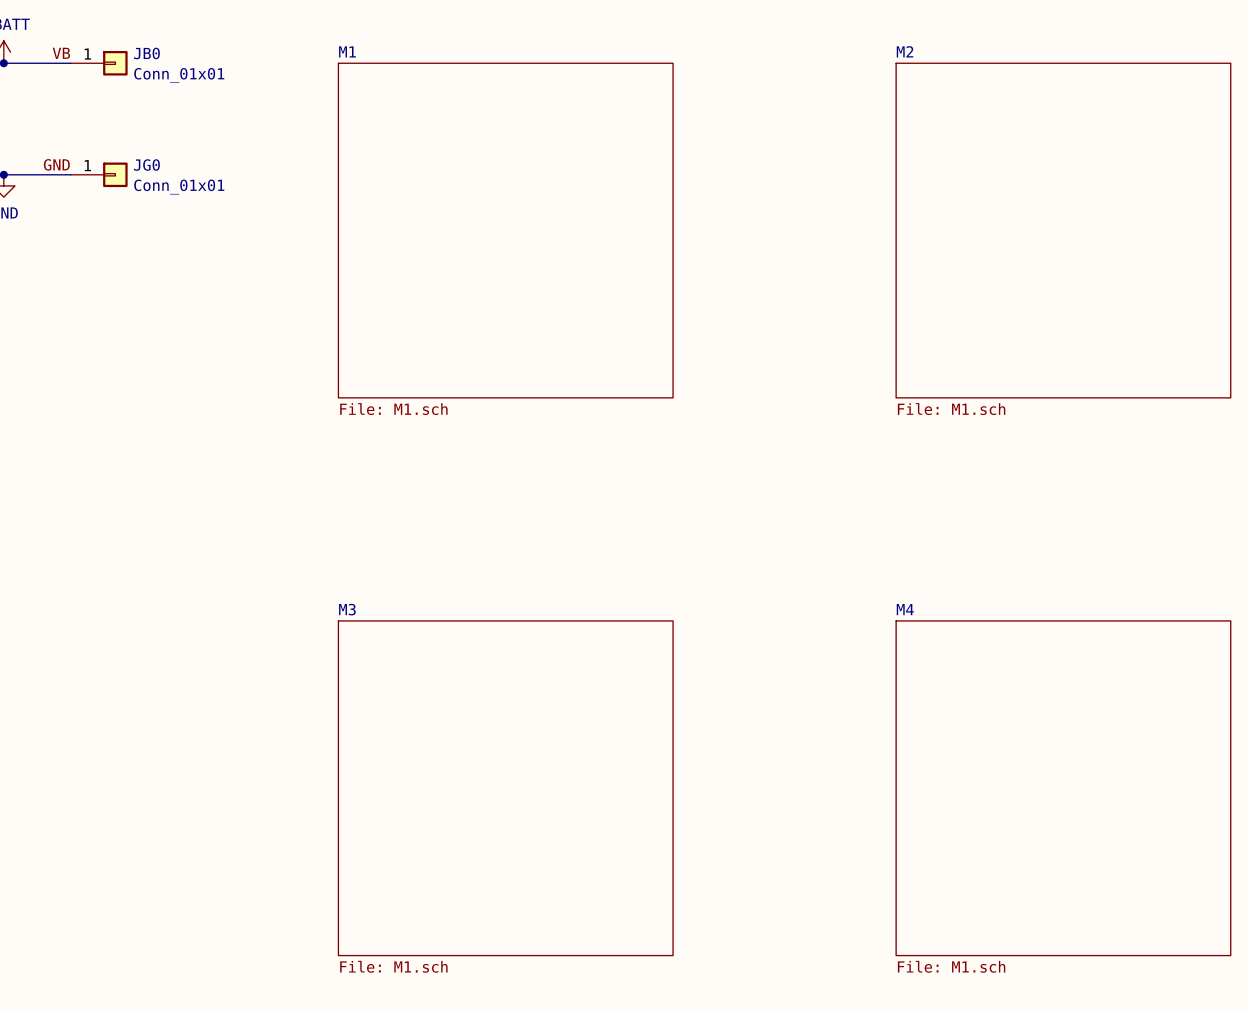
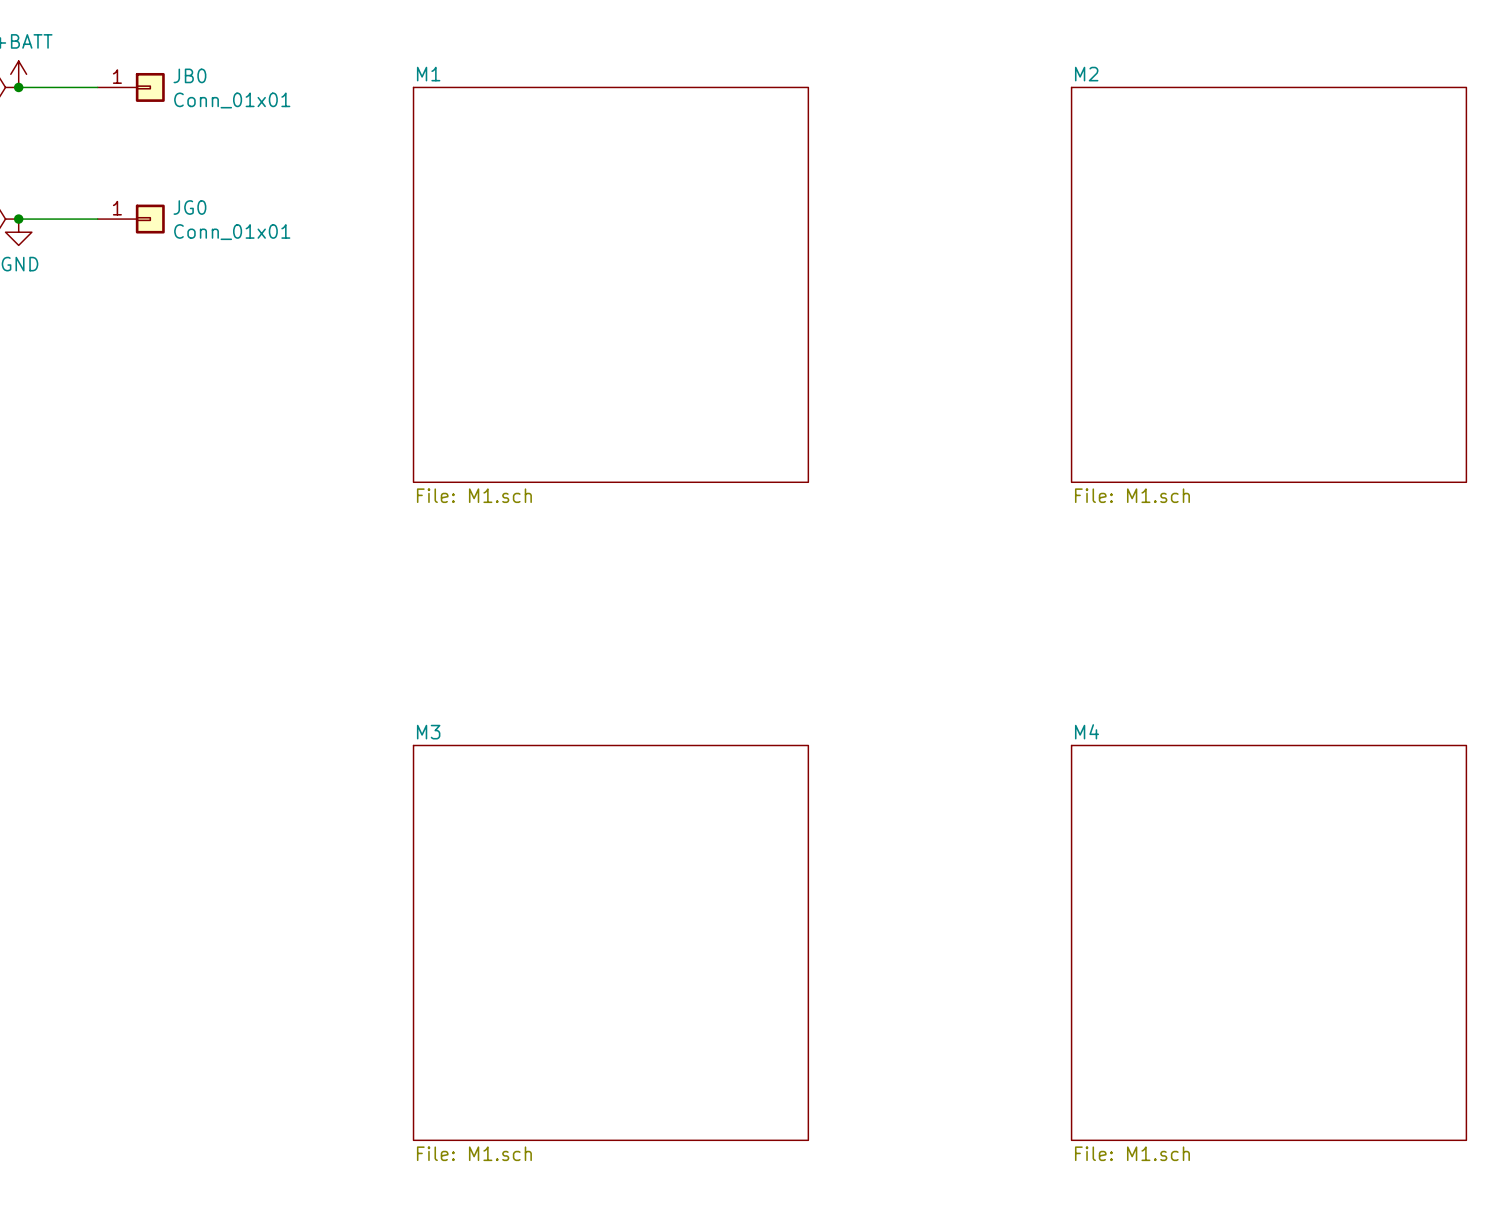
label: VB (61, 53) -> none
label: GND (56, 164) -> none

